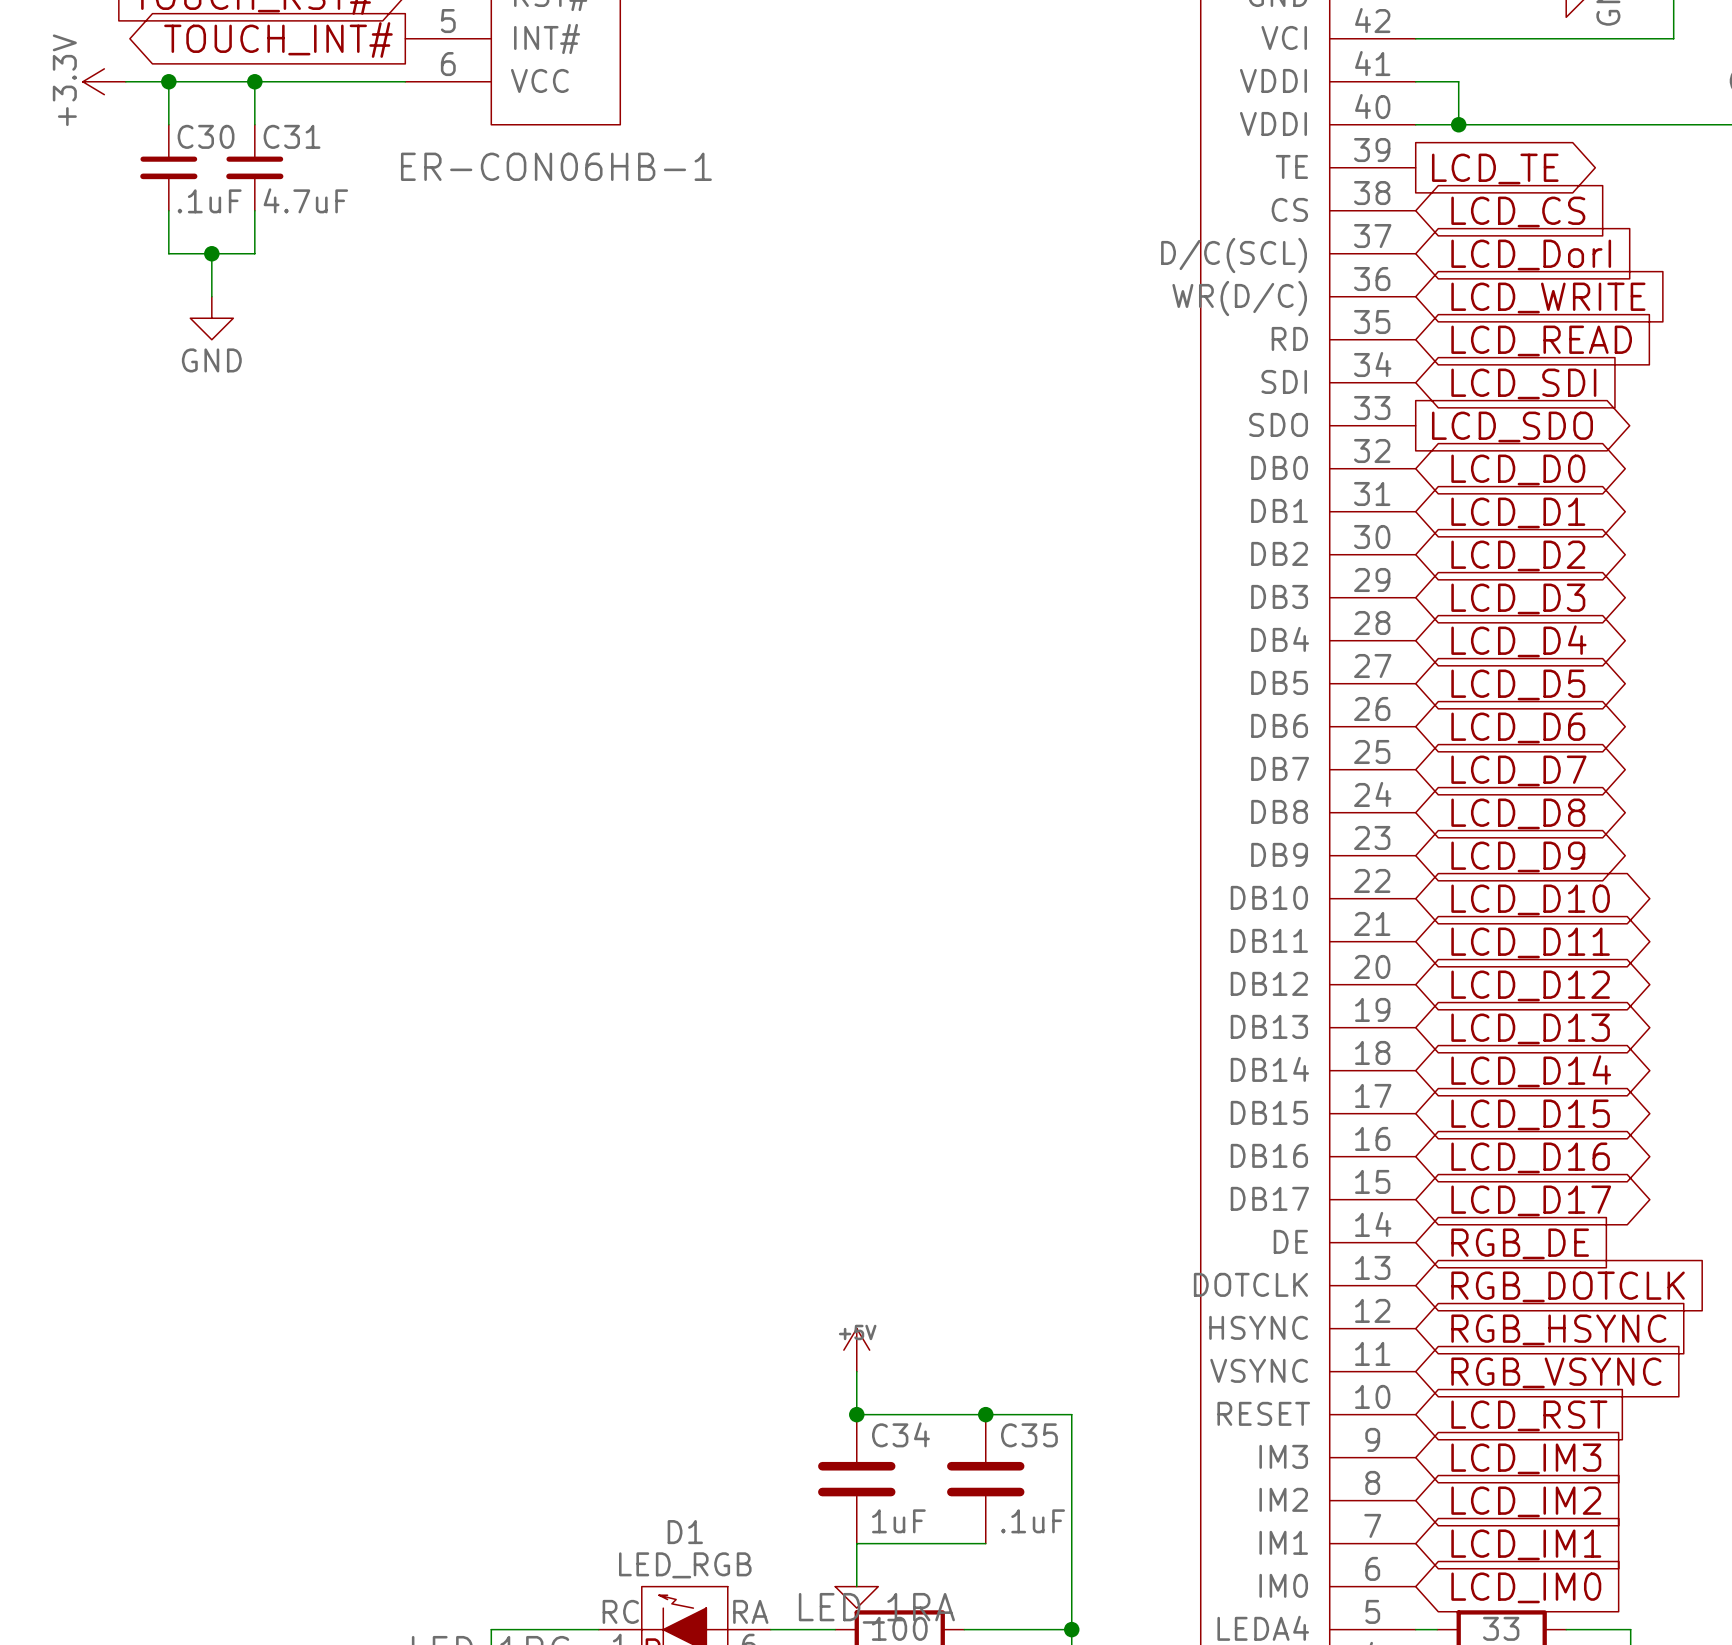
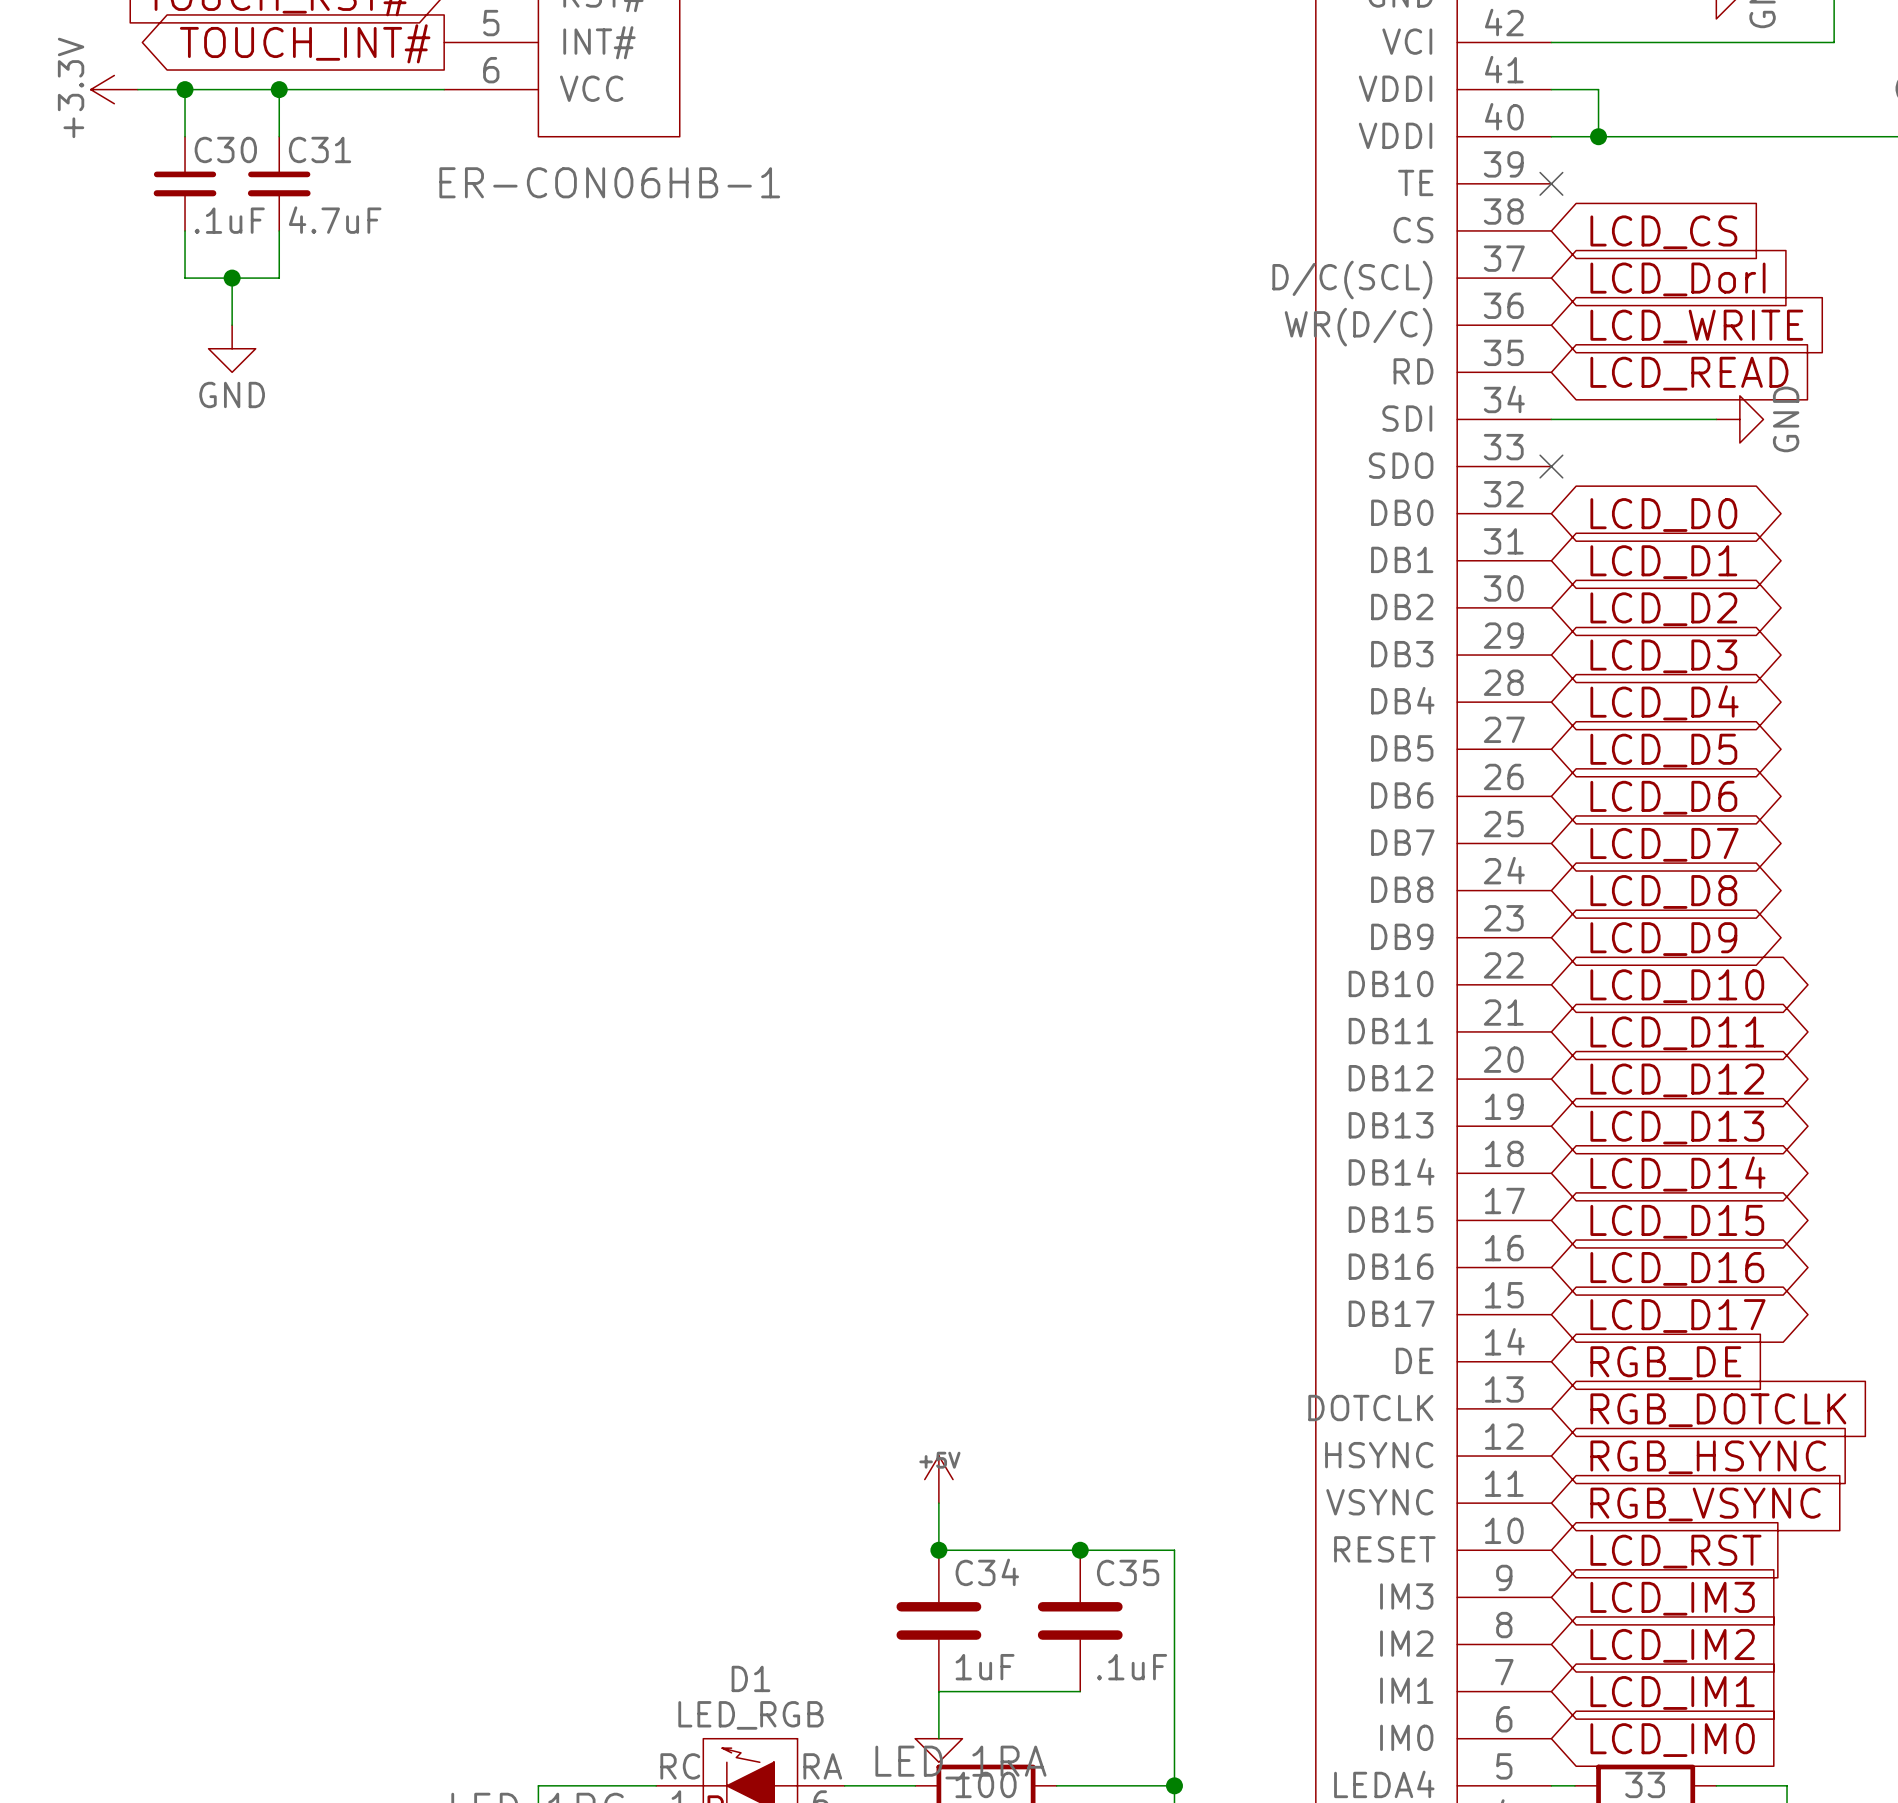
no-connect mark: none -> (1551, 183)
global label: LCD_TE (1495, 168) -> none
wire: none -> (1551, 419) (1716, 419)
power symbol: none -> GND (1739, 419)
global label: LCD_SDI (1523, 383) -> none
no-connect mark: none -> (1551, 466)
global label: LCD_SDO (1512, 426) -> none

